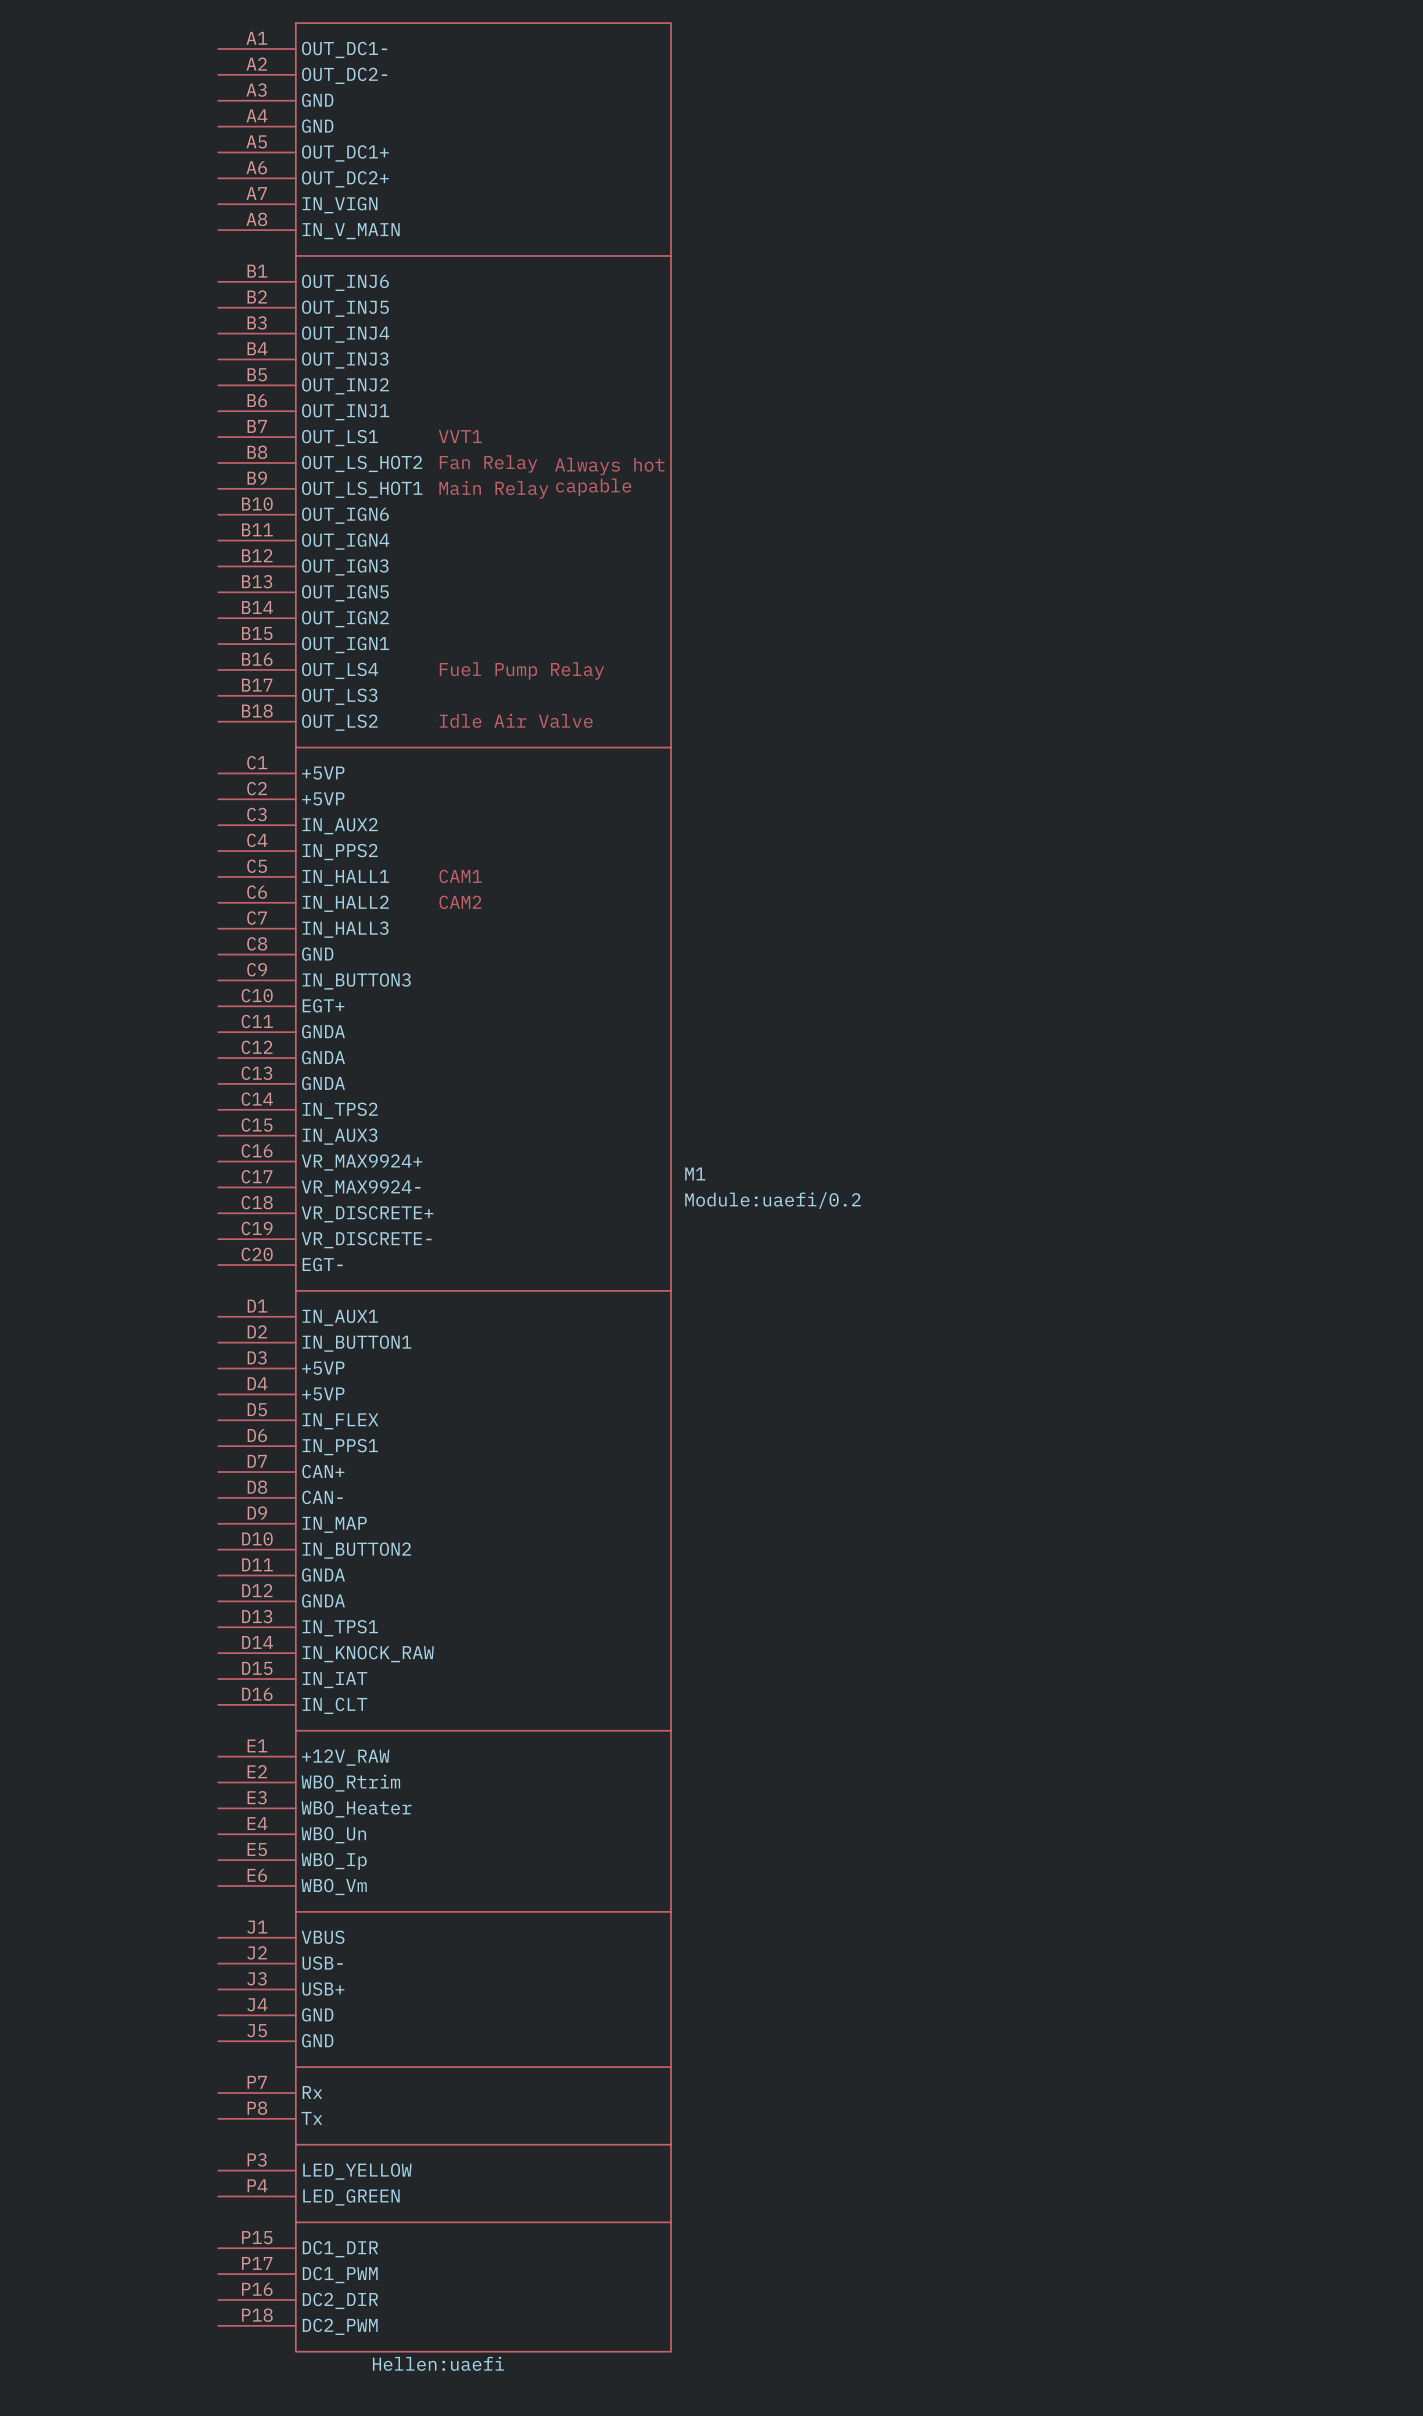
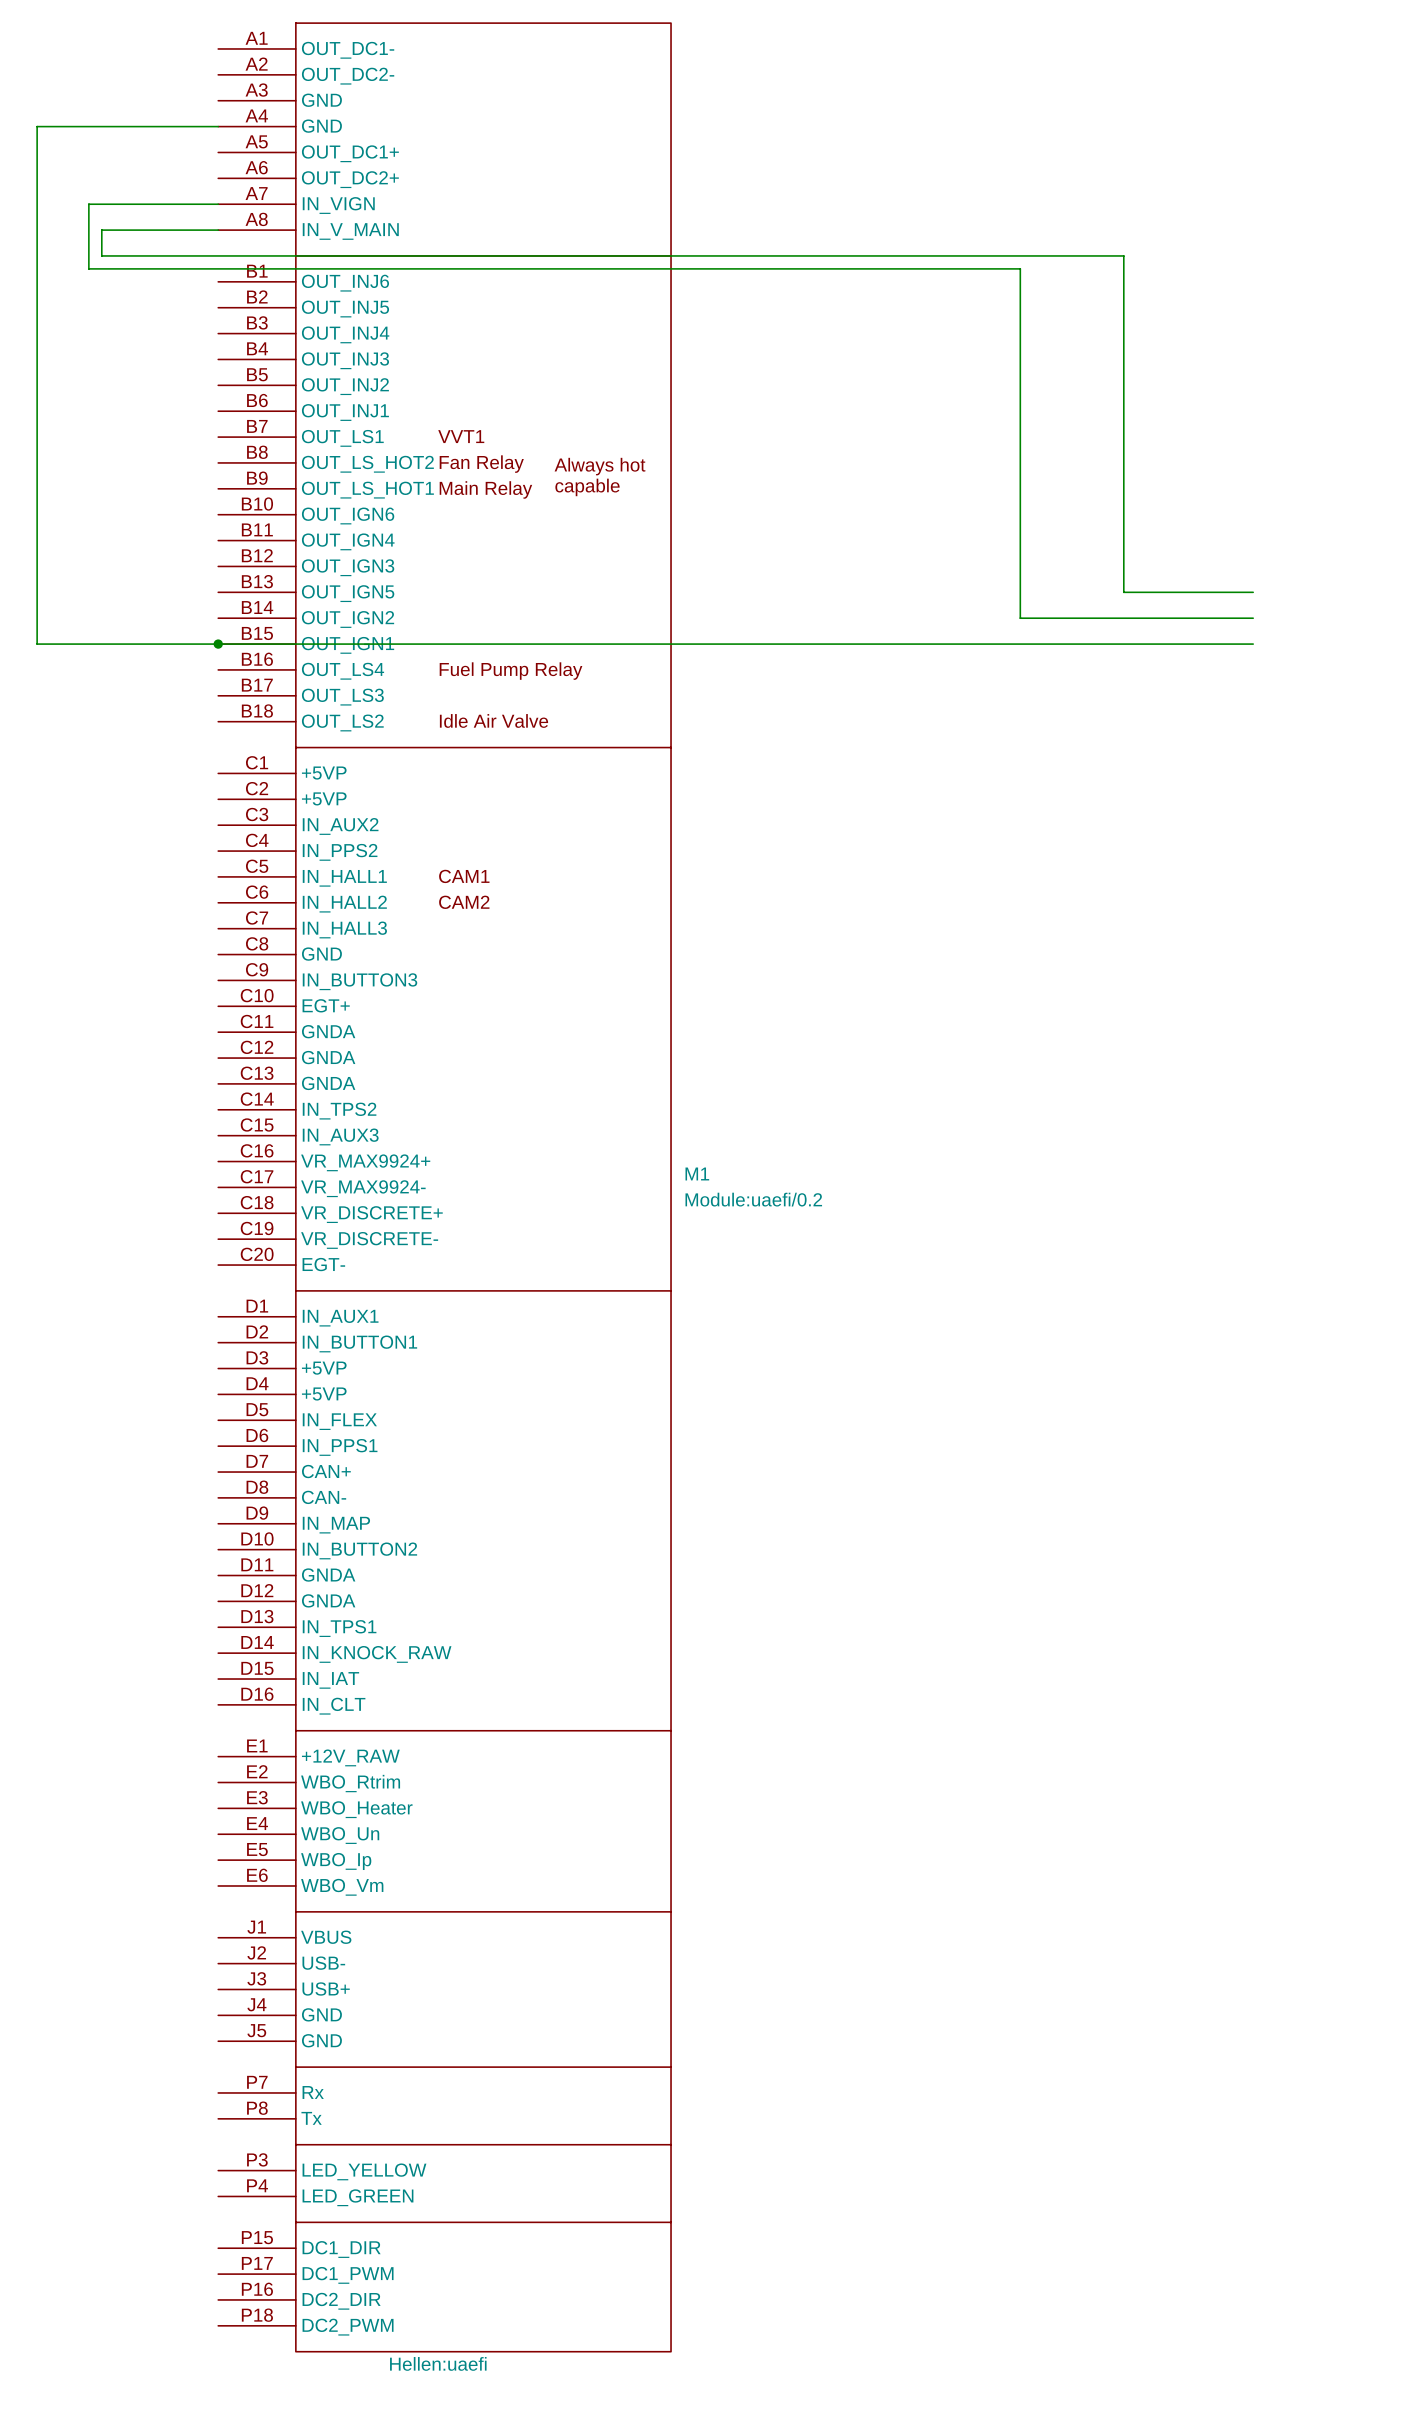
wire: none -> (218, 126) (37, 126) (37, 644) (1253, 644)
wire: none -> (218, 204) (88, 204) (88, 268) (1020, 268) (1020, 618) (1253, 618)
wire: none -> (218, 230) (101, 230) (101, 255) (1123, 255) (1123, 592) (1253, 592)
junction: none -> (218, 644)

